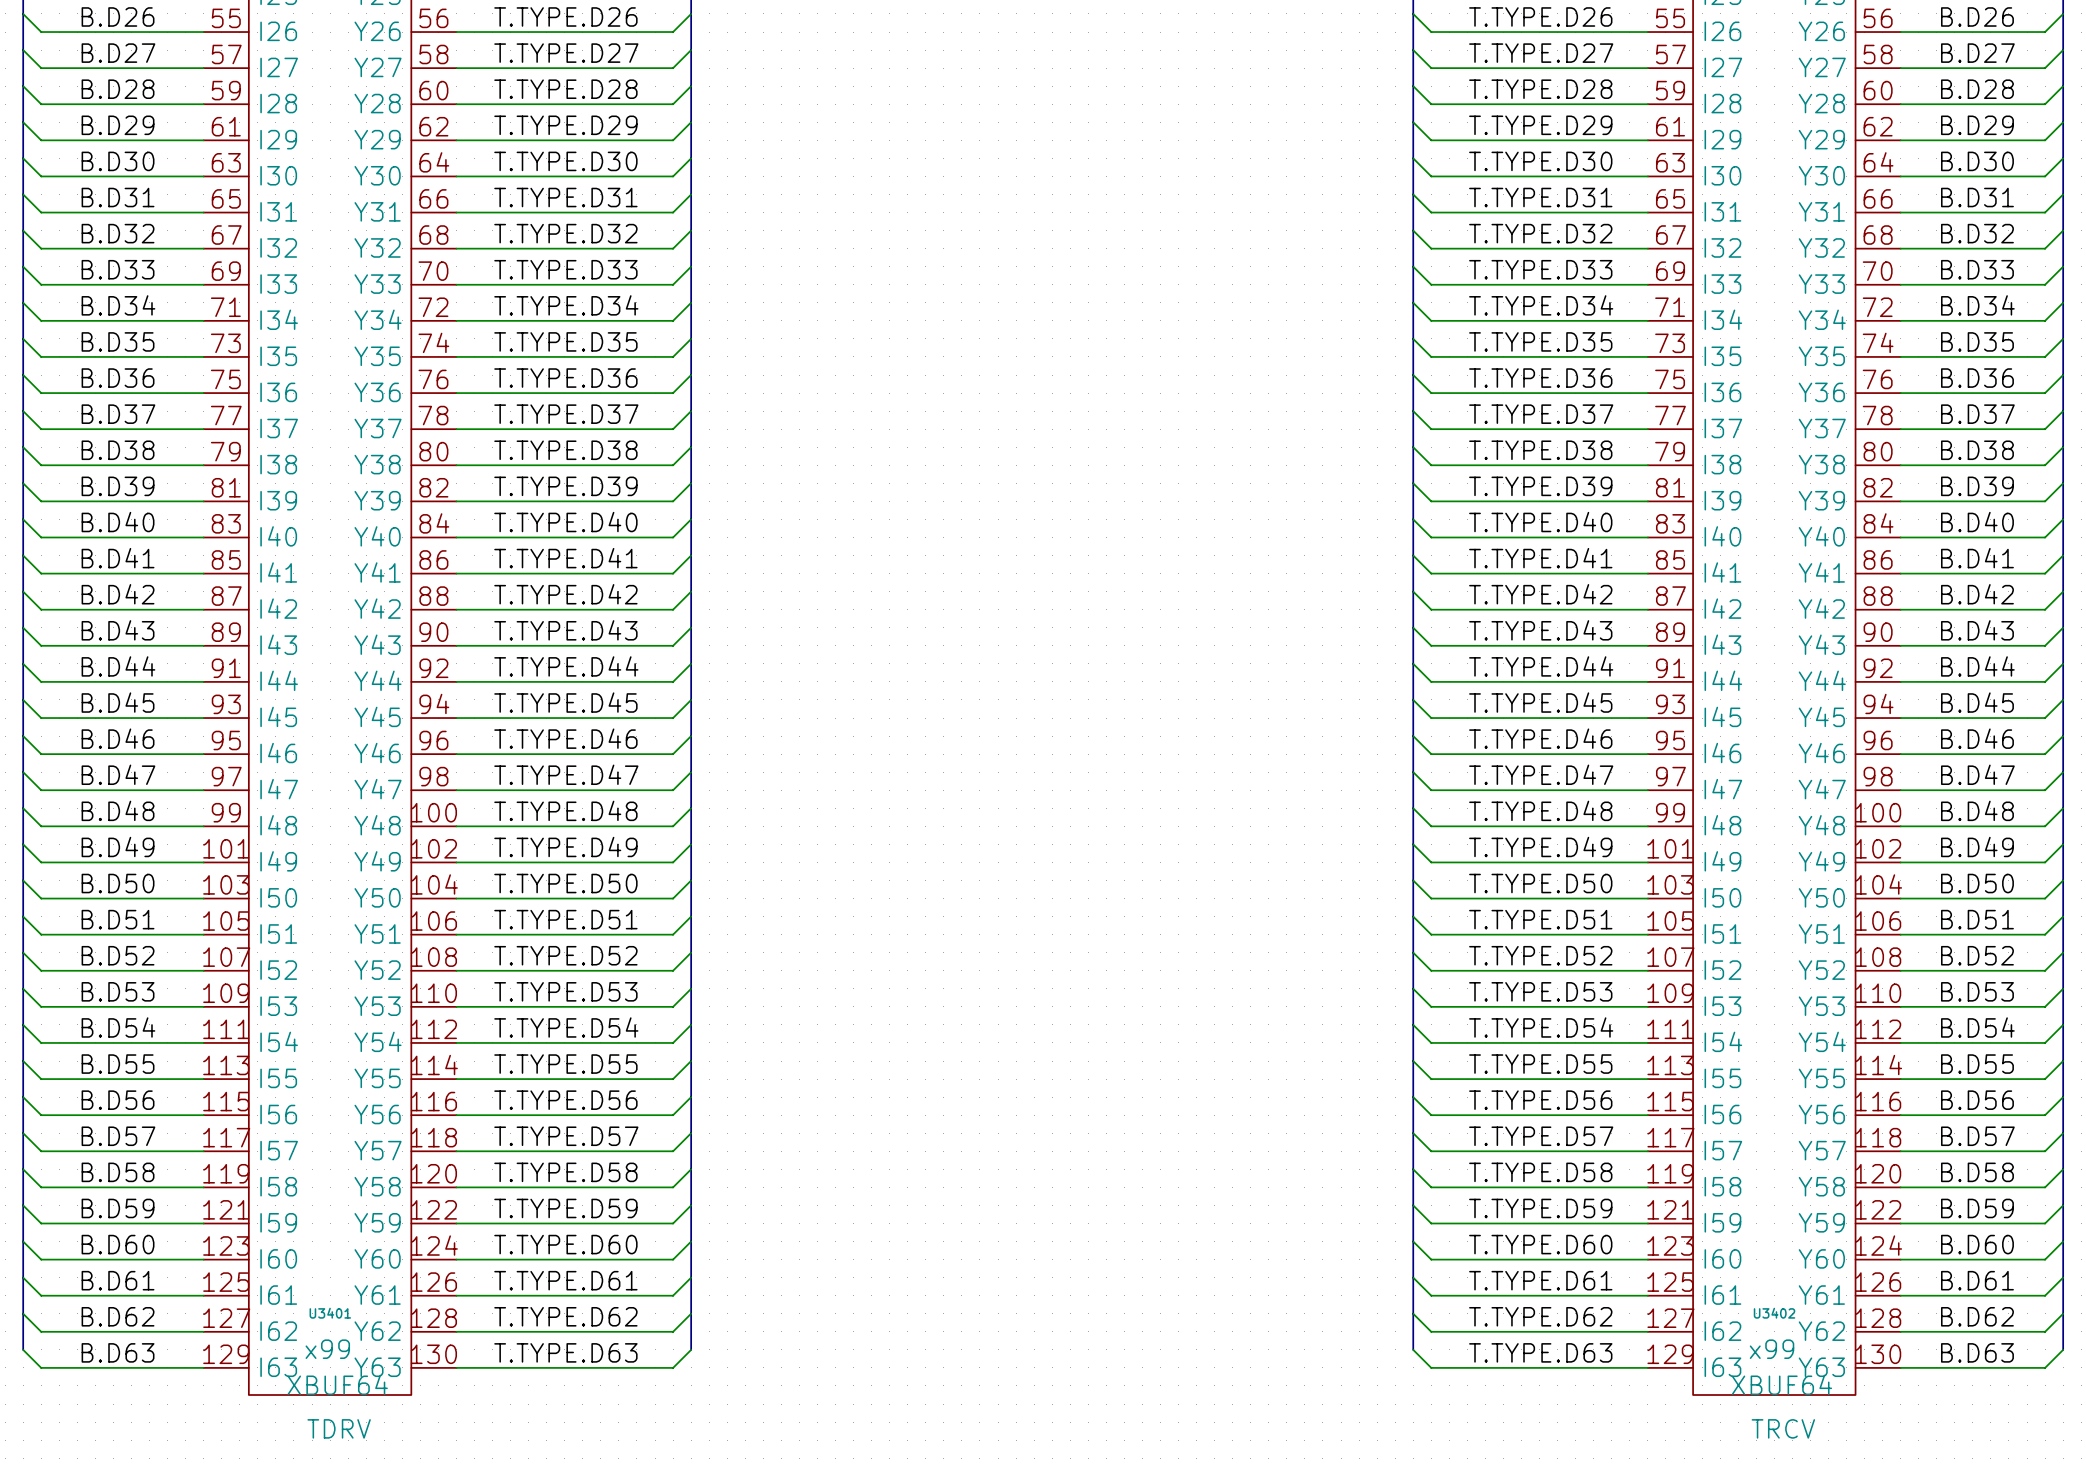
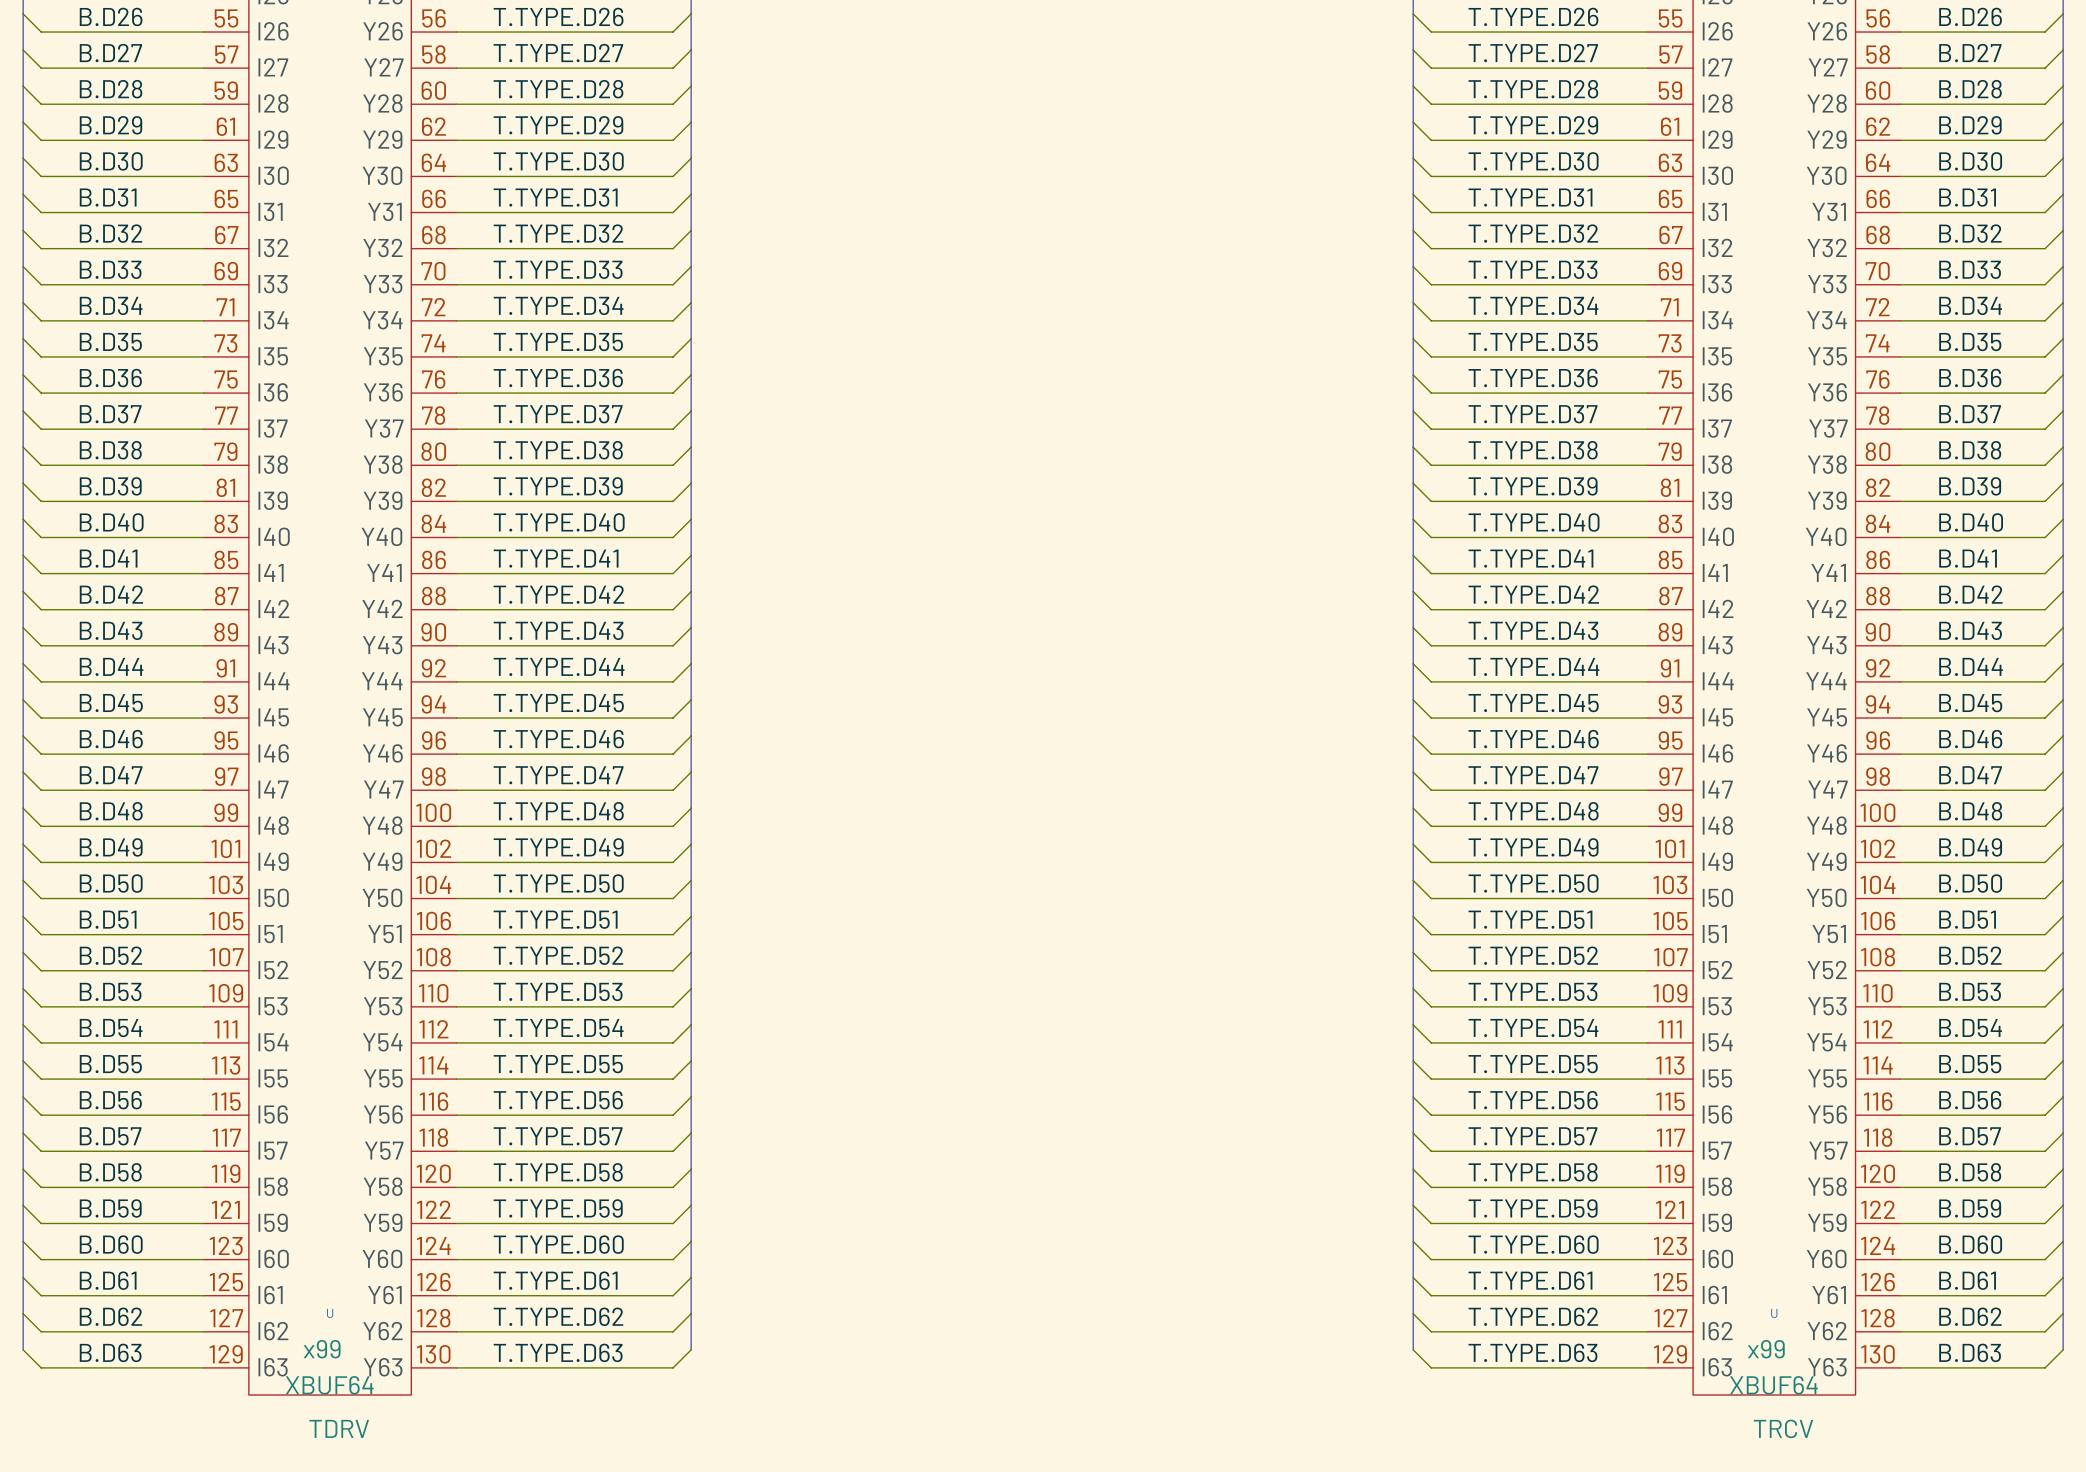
U3401 name: U3401 (330, 1313) -> U (330, 1313)
U3402 name: U3402 (1774, 1313) -> U (1774, 1313)

